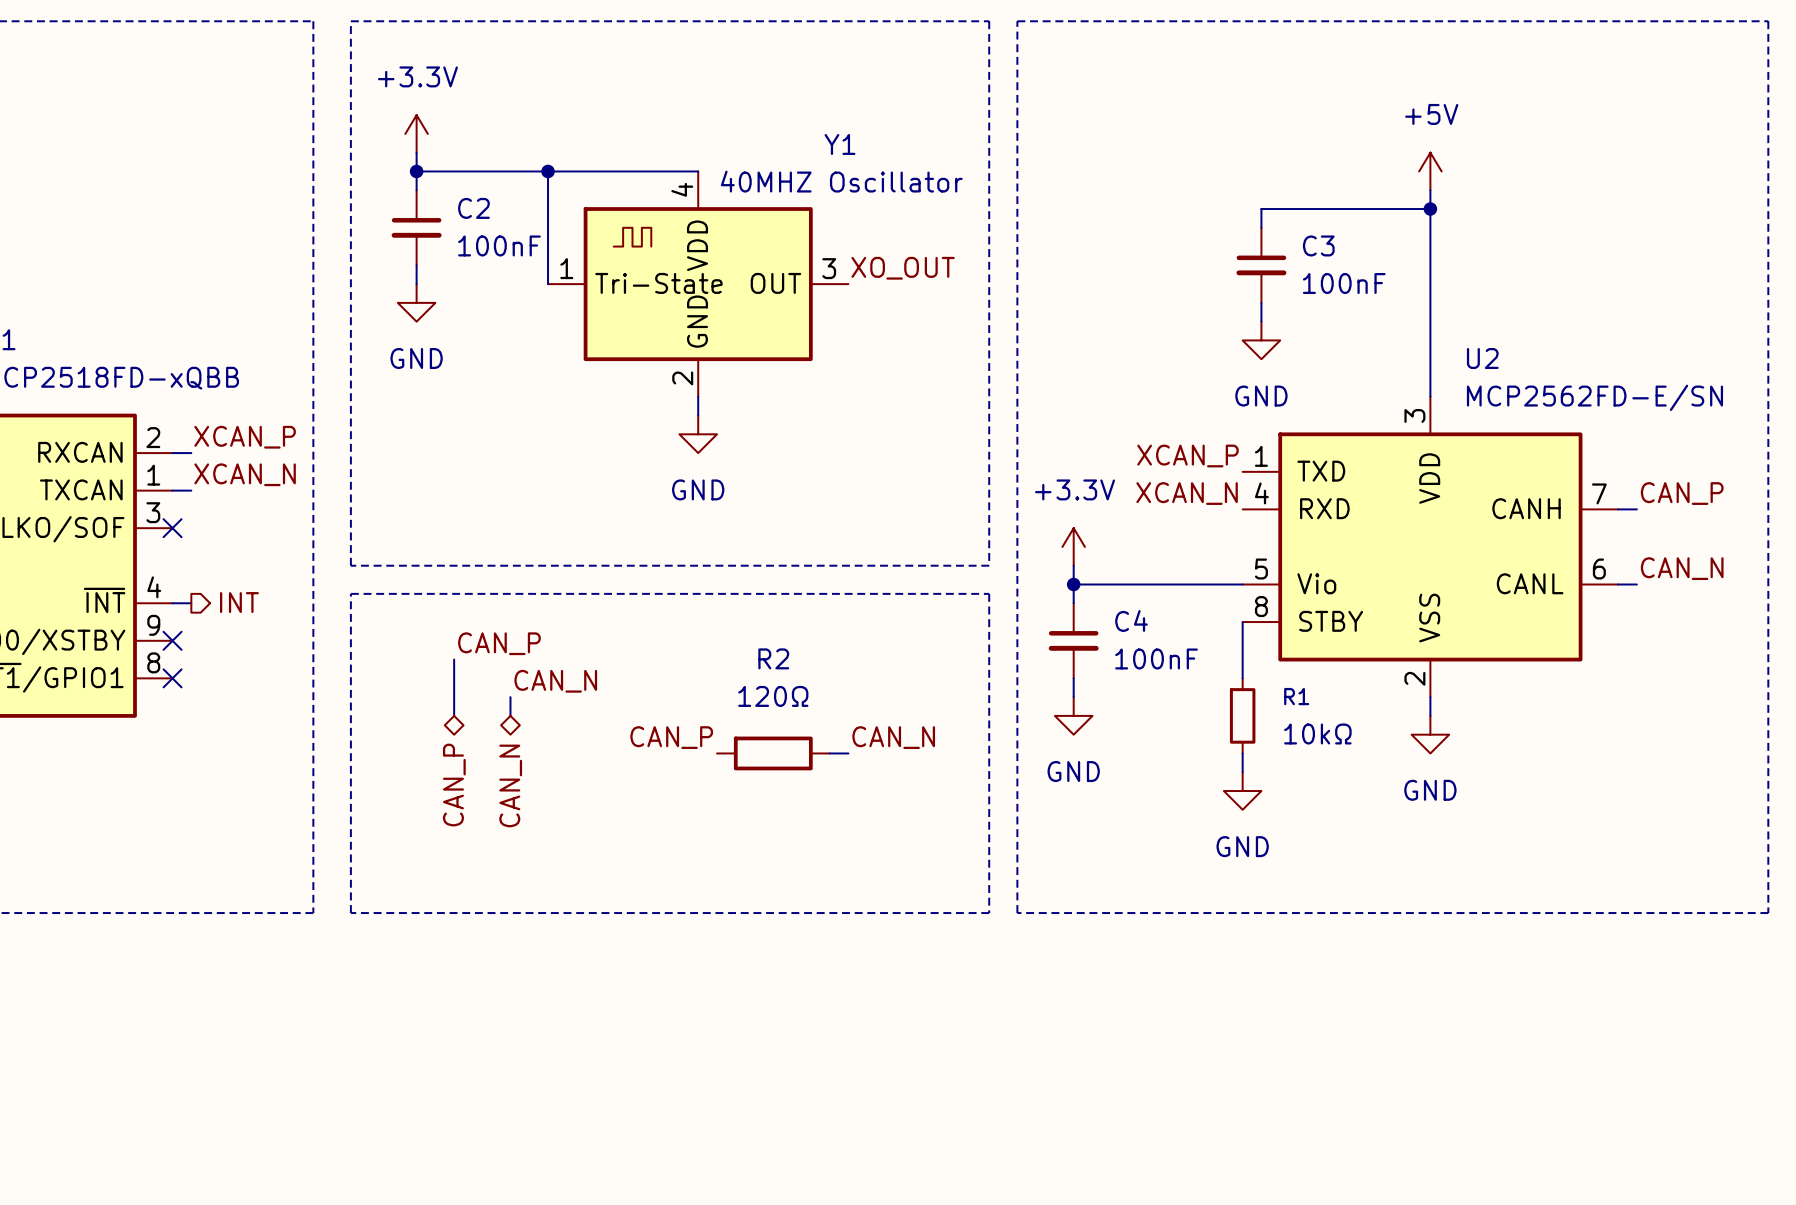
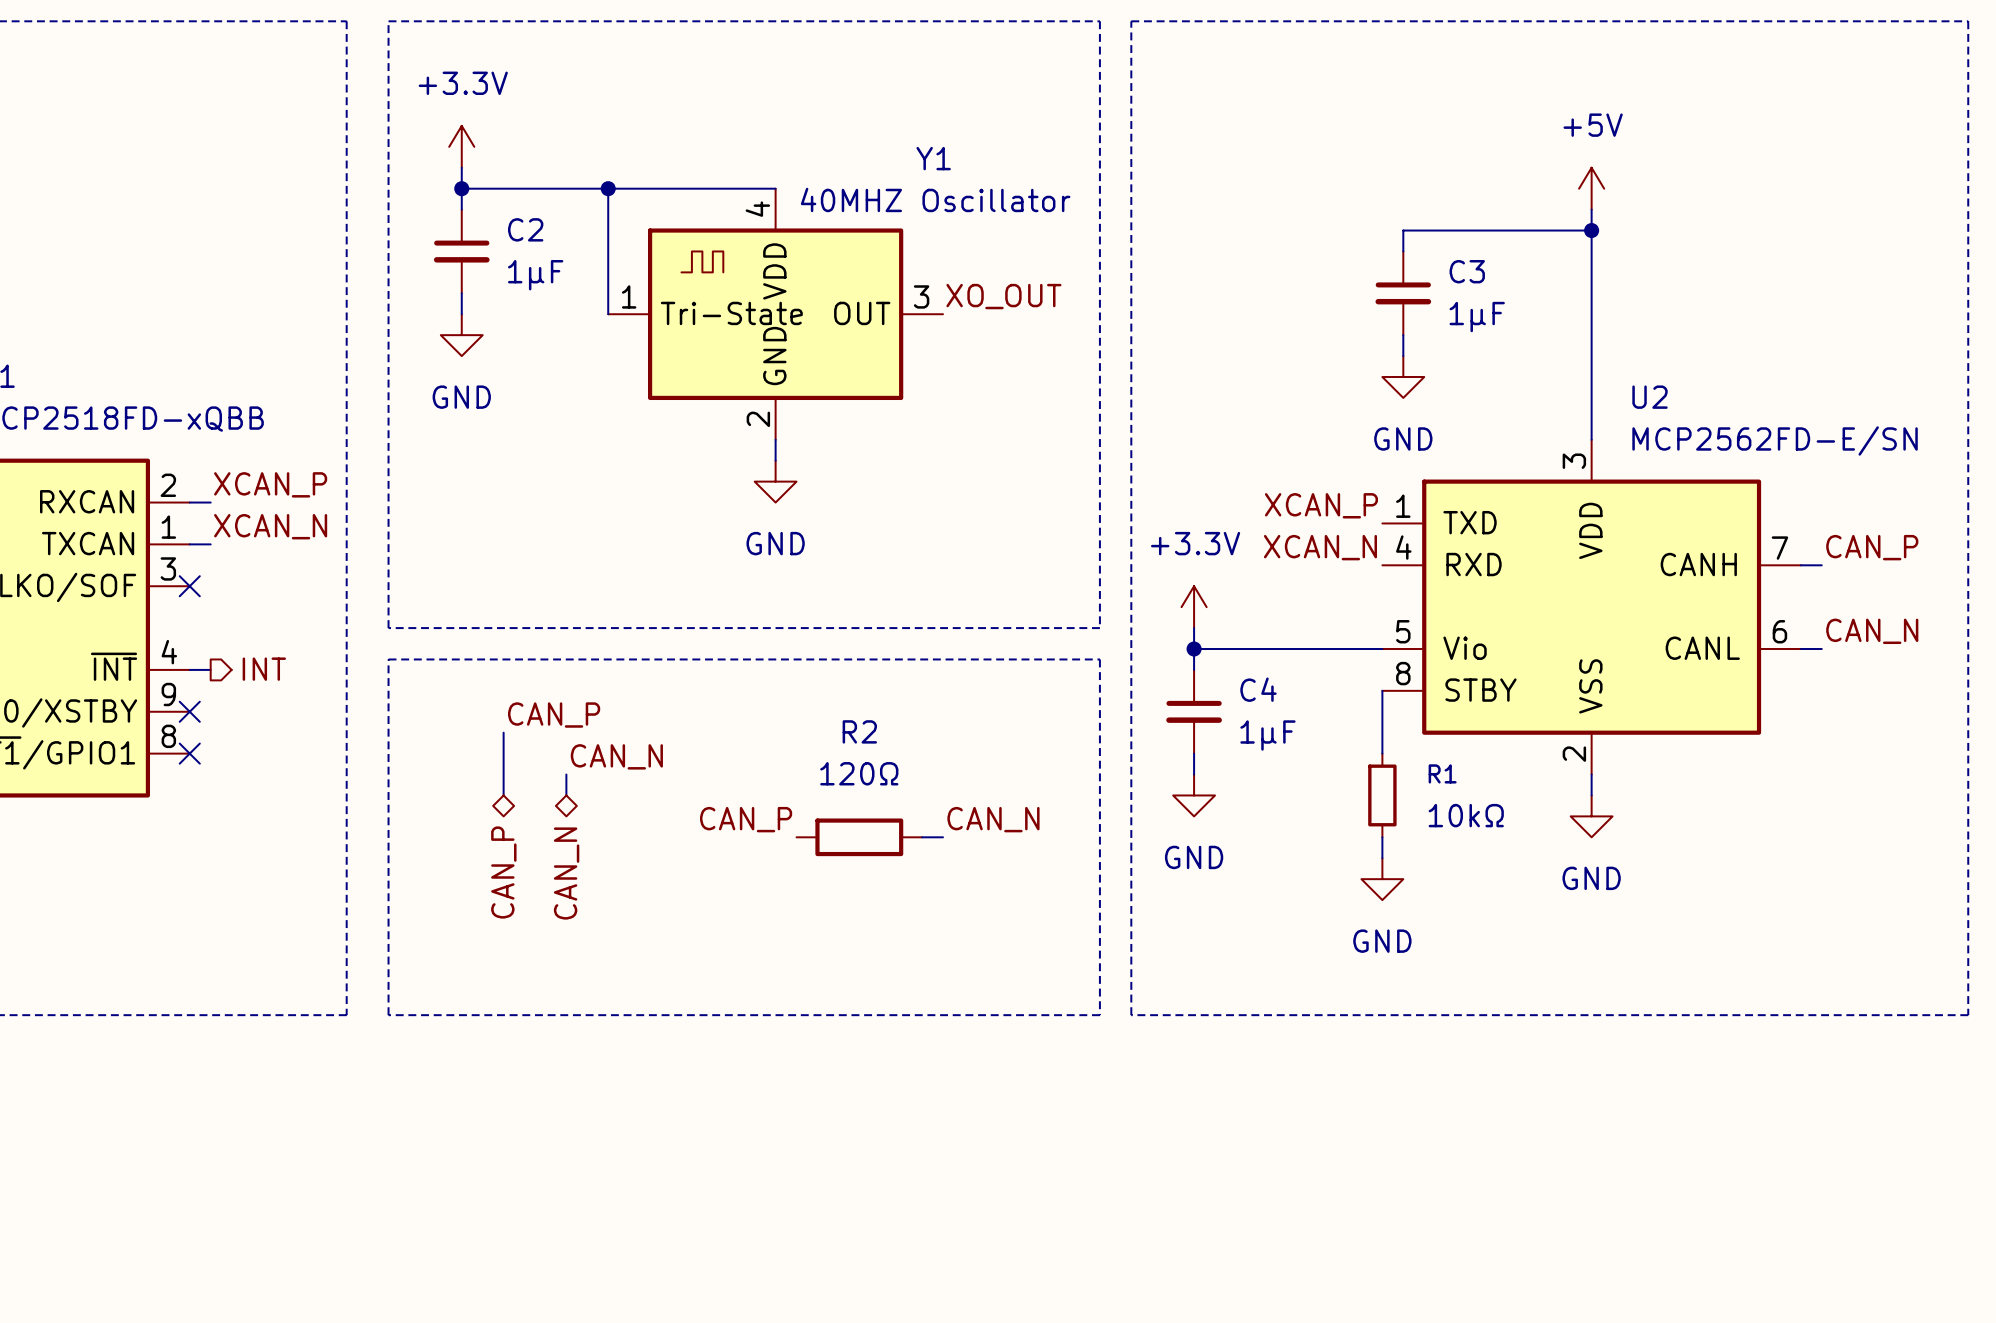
C2 value: 100nF (499, 245) -> 1µF (535, 275)
C3 value: 100nF (1344, 283) -> 1µF (1477, 317)
C4 value: 100nF (1156, 658) -> 1µF (1267, 735)

